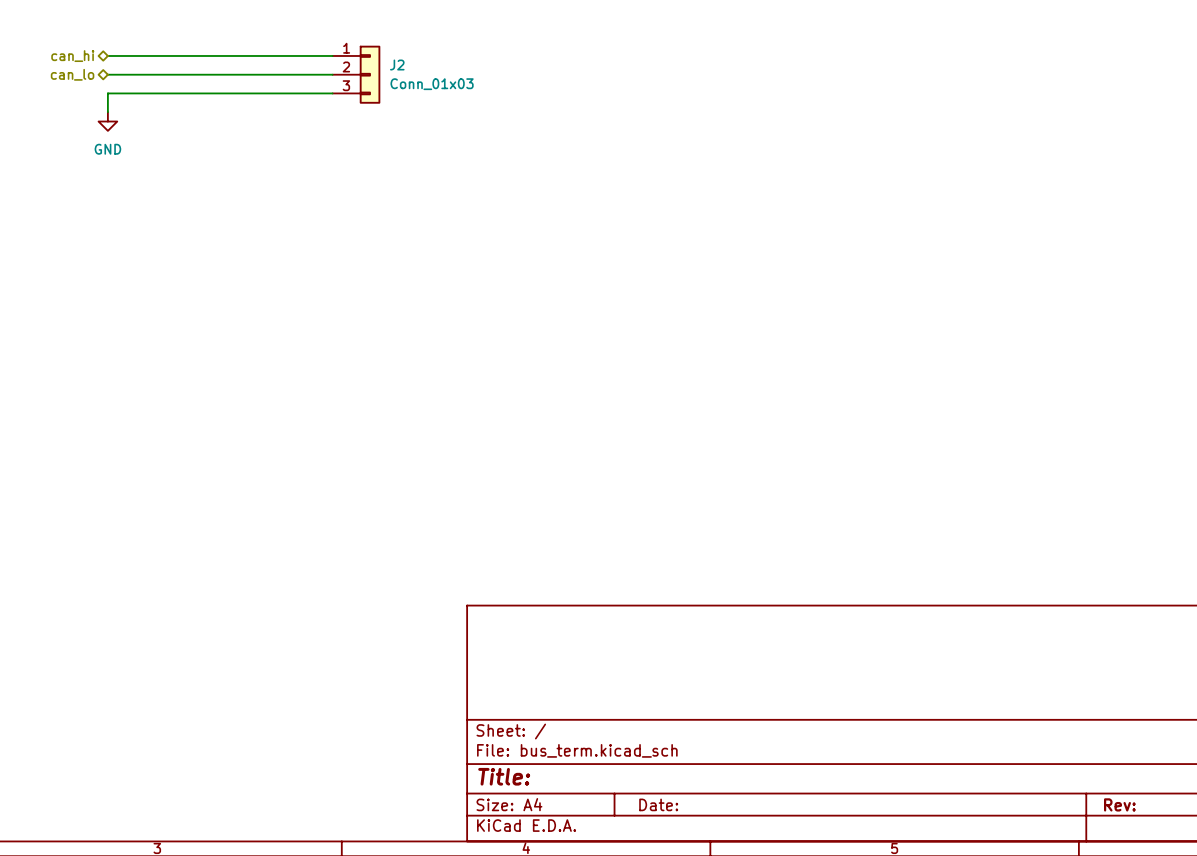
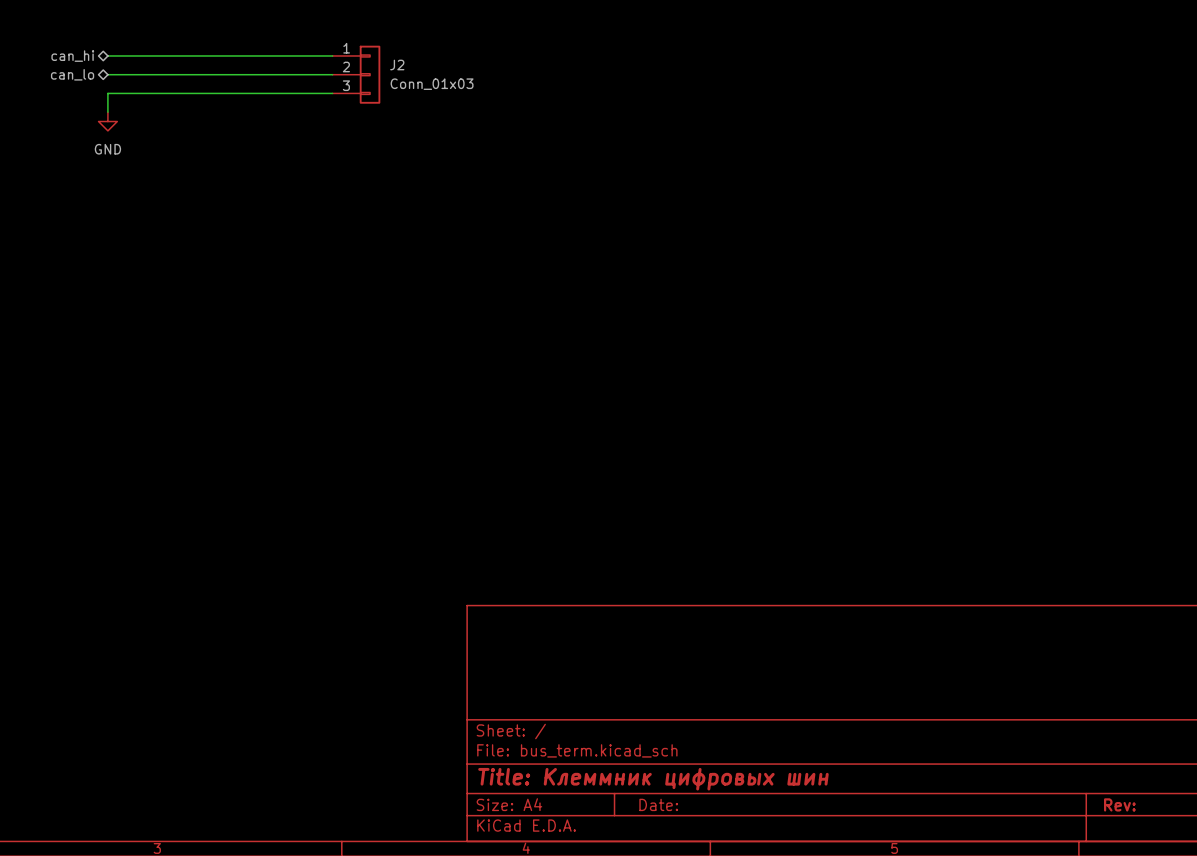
title block: Title: (504, 776) -> Title: Клеммник цифровых шин (653, 779)

